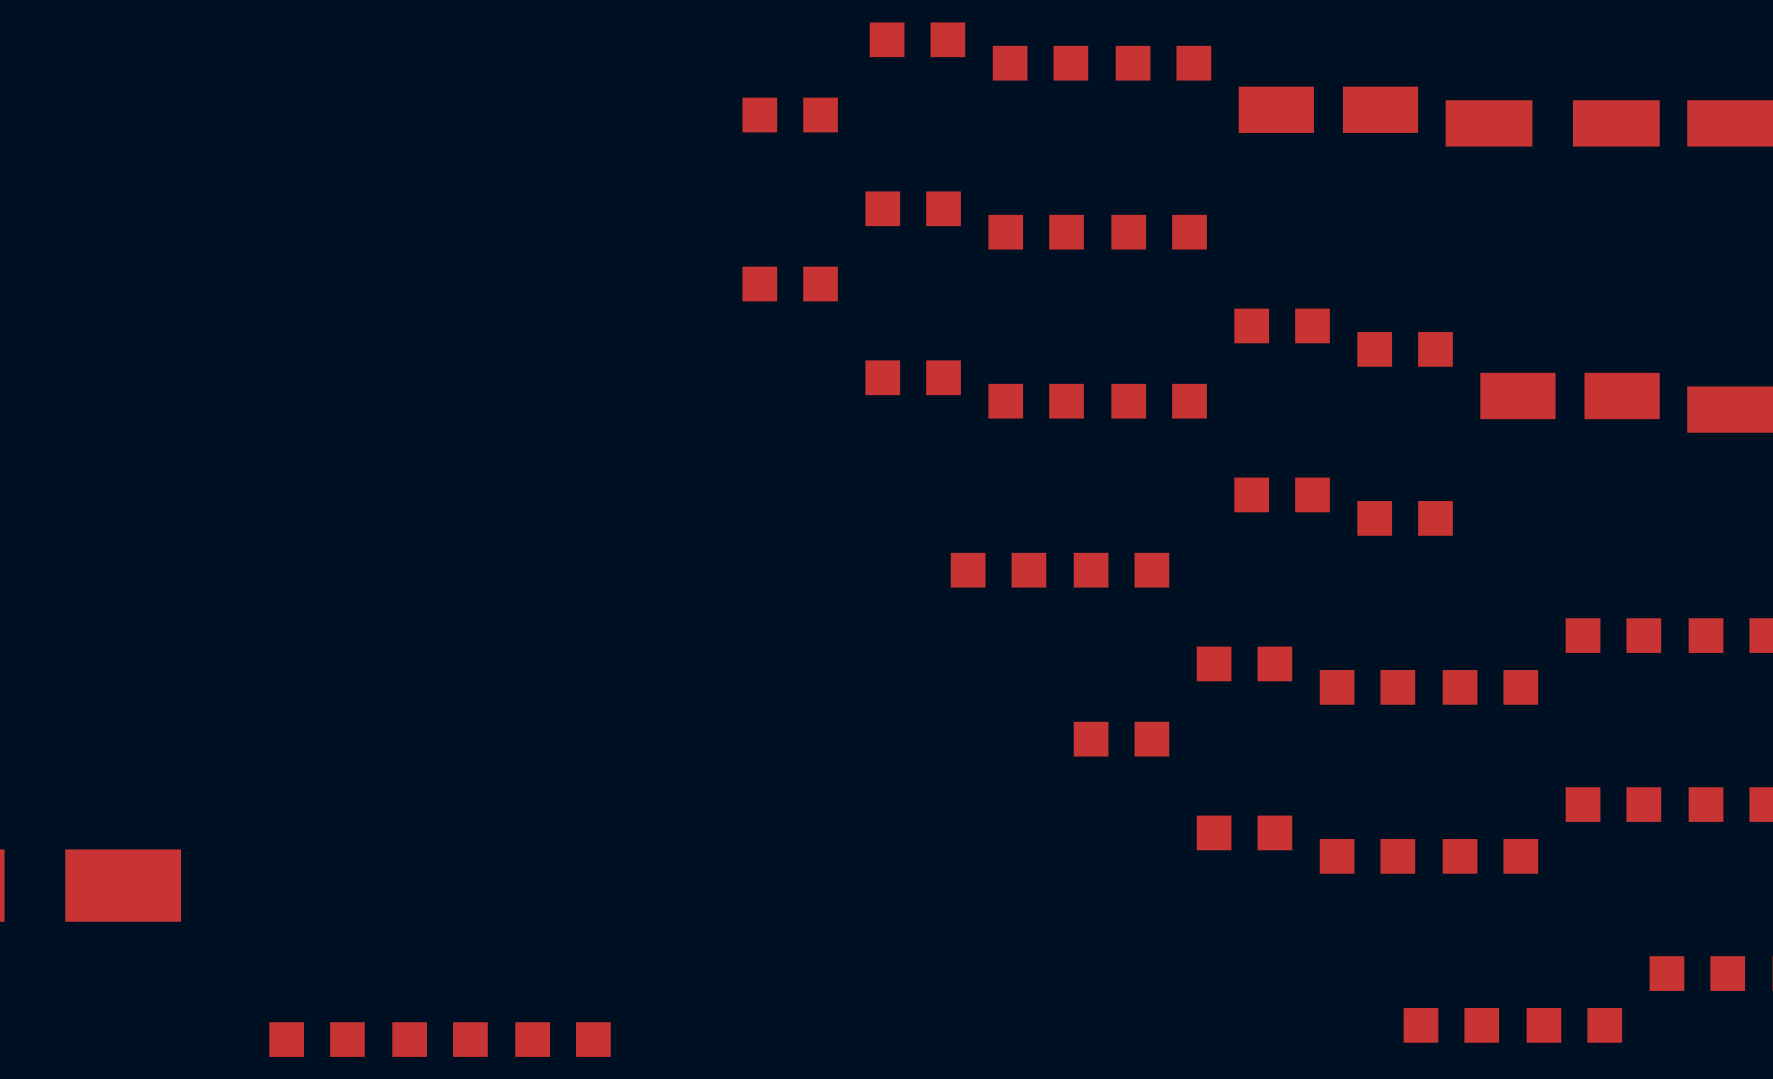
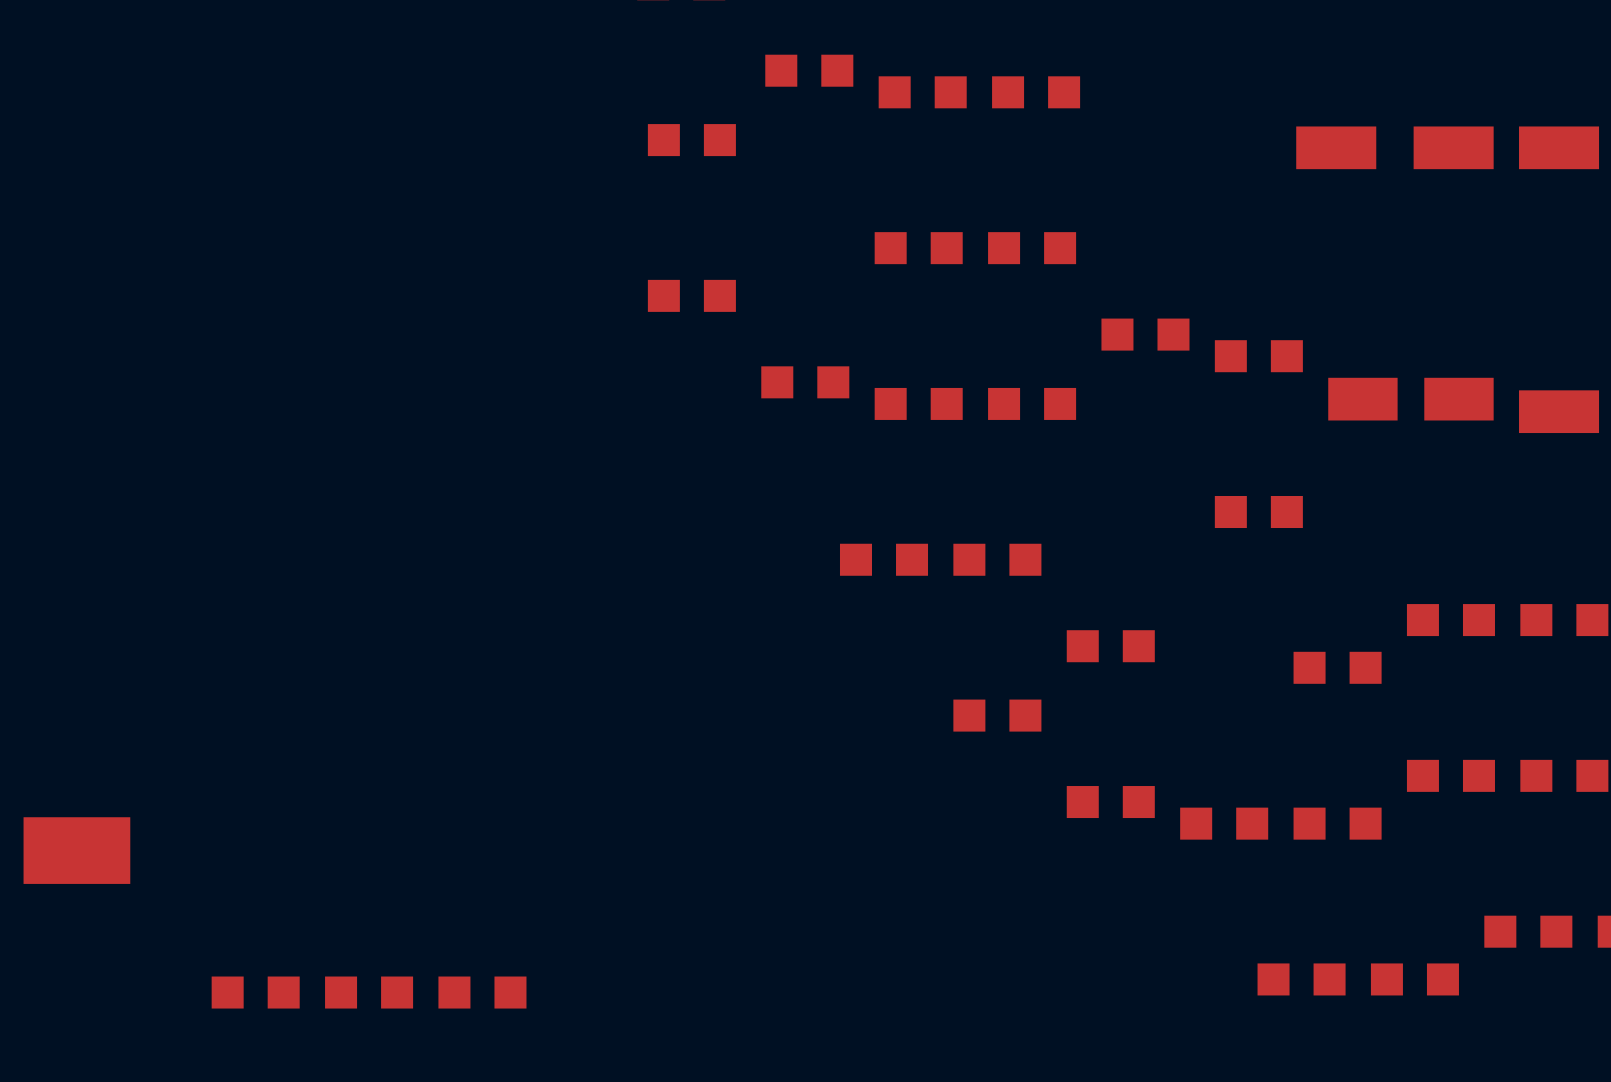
part: (1328, 109) -> none
part: (913, 208) -> none
part: (1282, 494) -> none
part: (1367, 687) -> none

